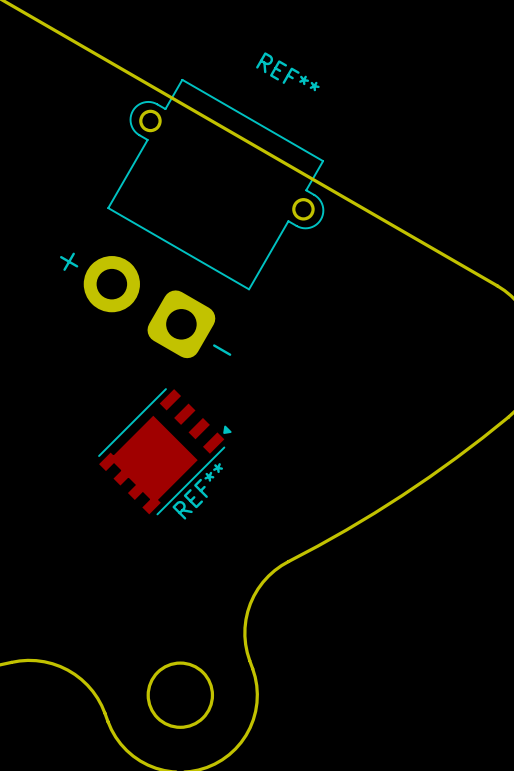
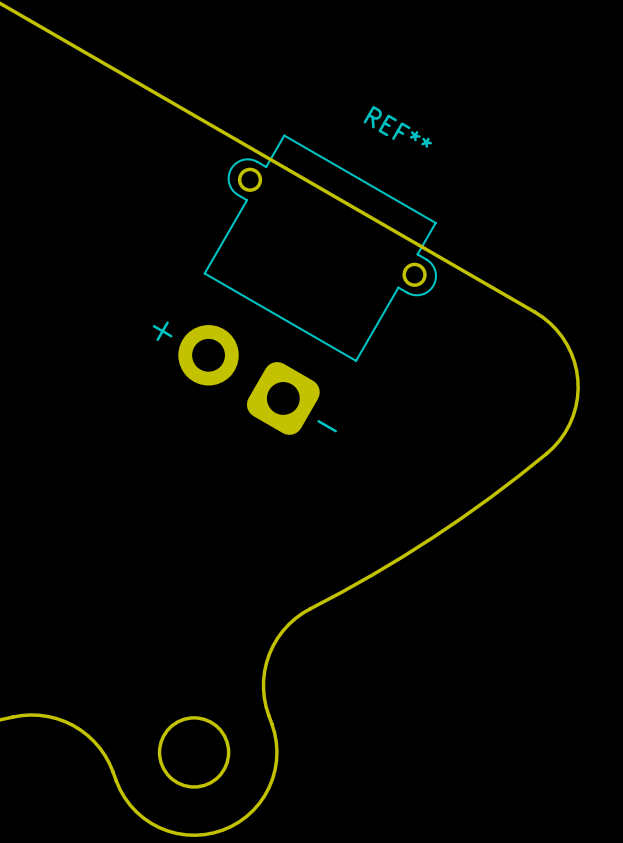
REF** position: (204, 218) -> (307, 284)
REF**: (164, 451) -> none

